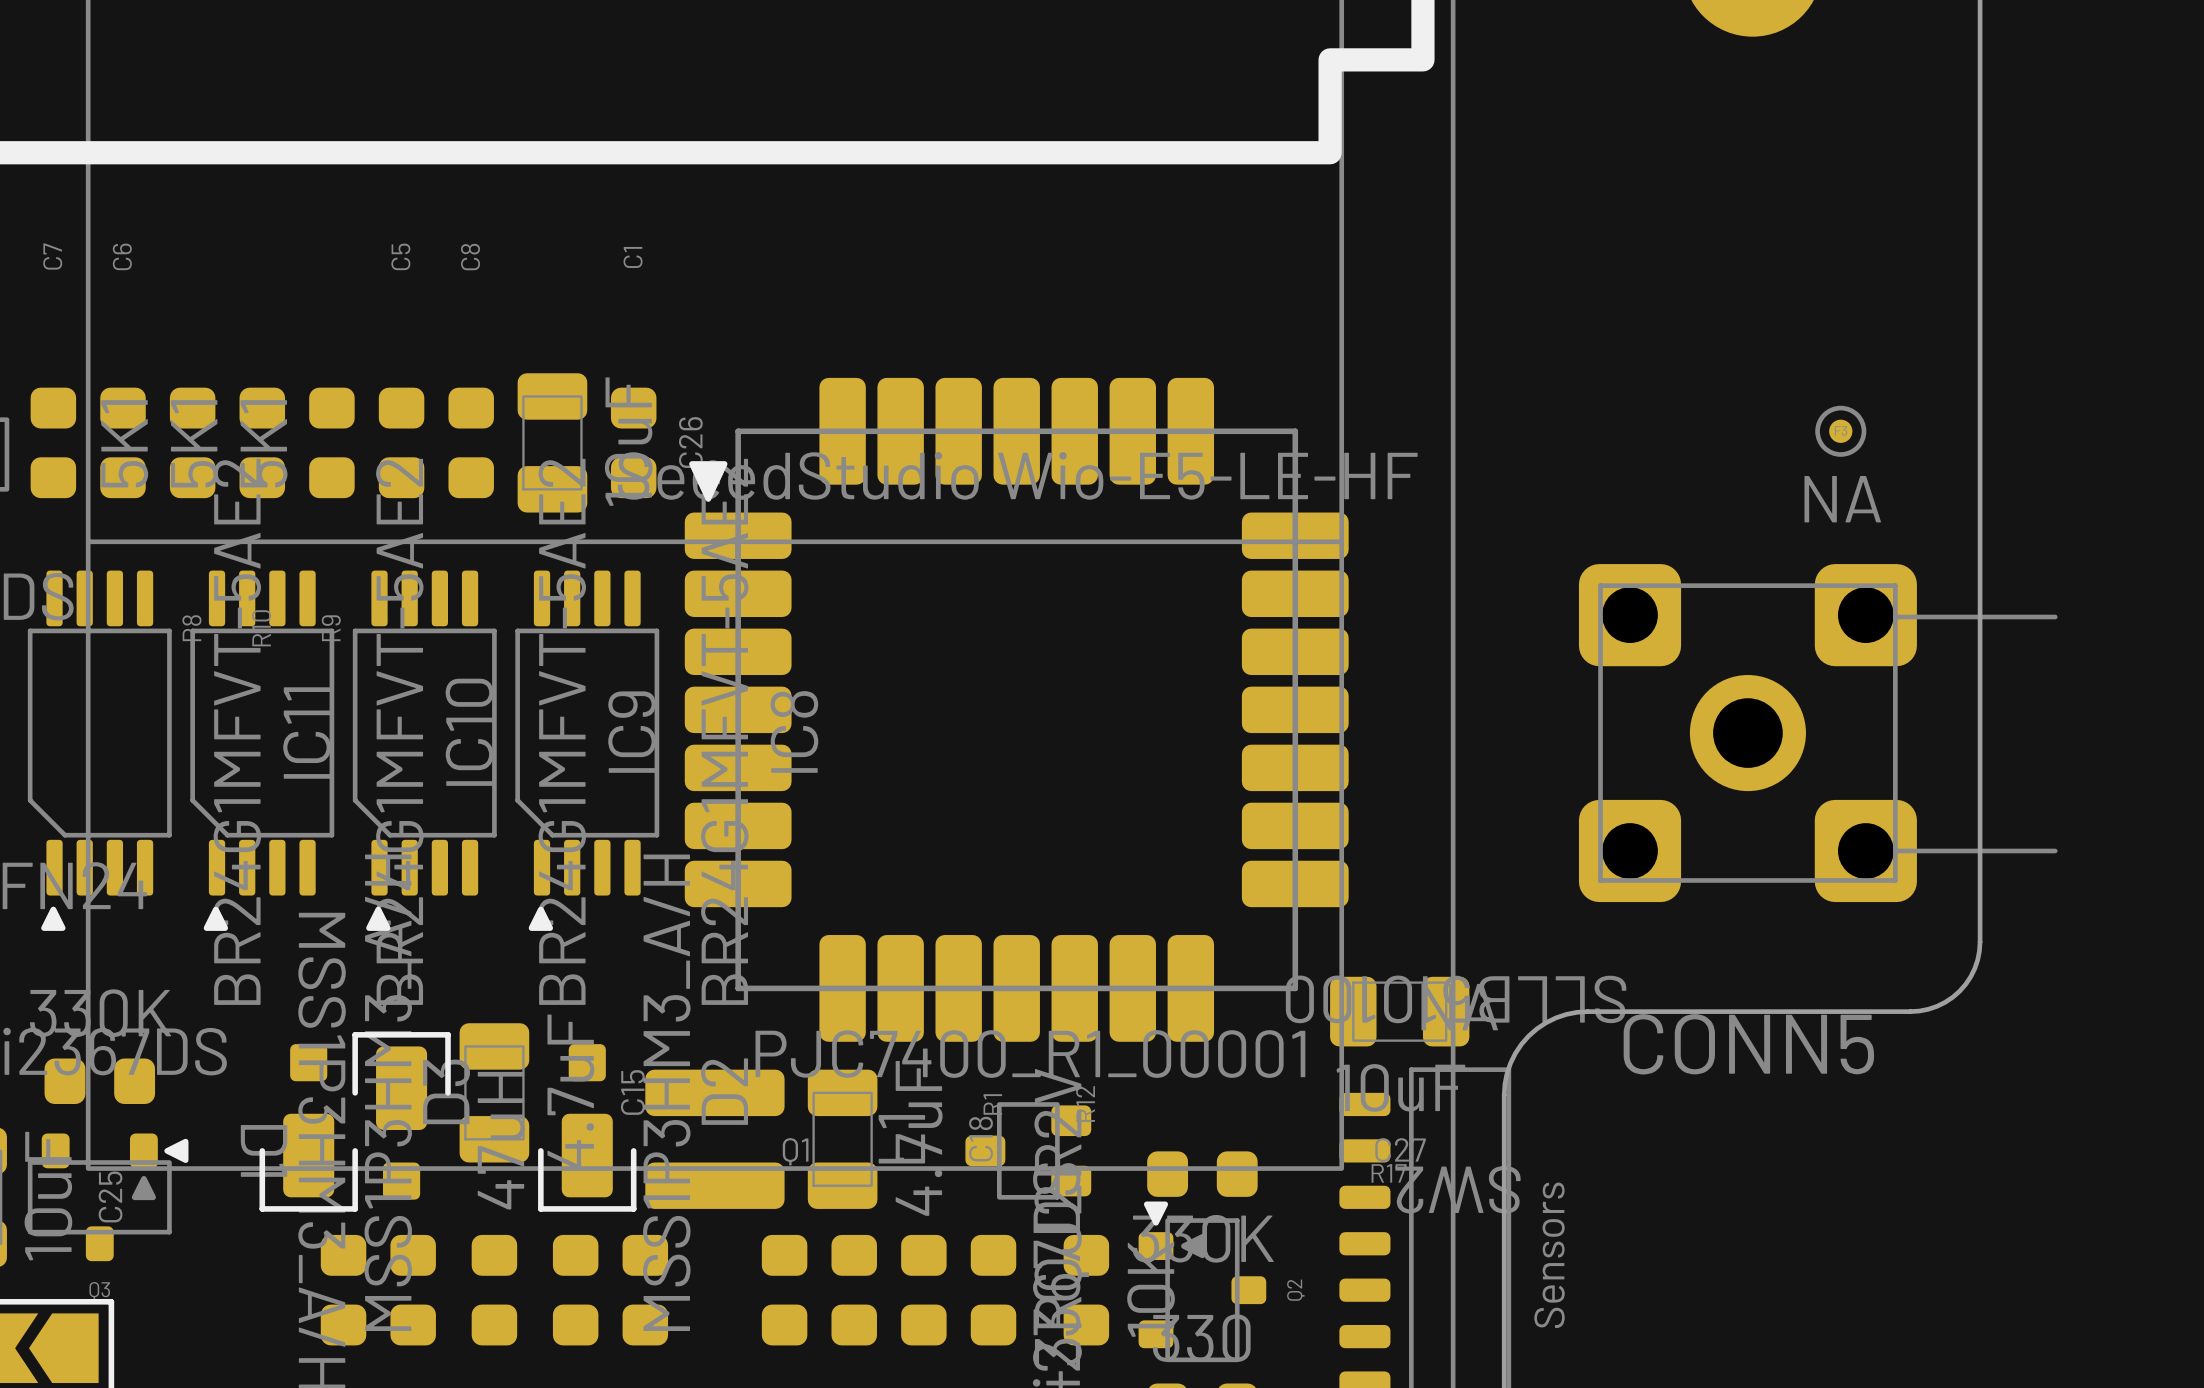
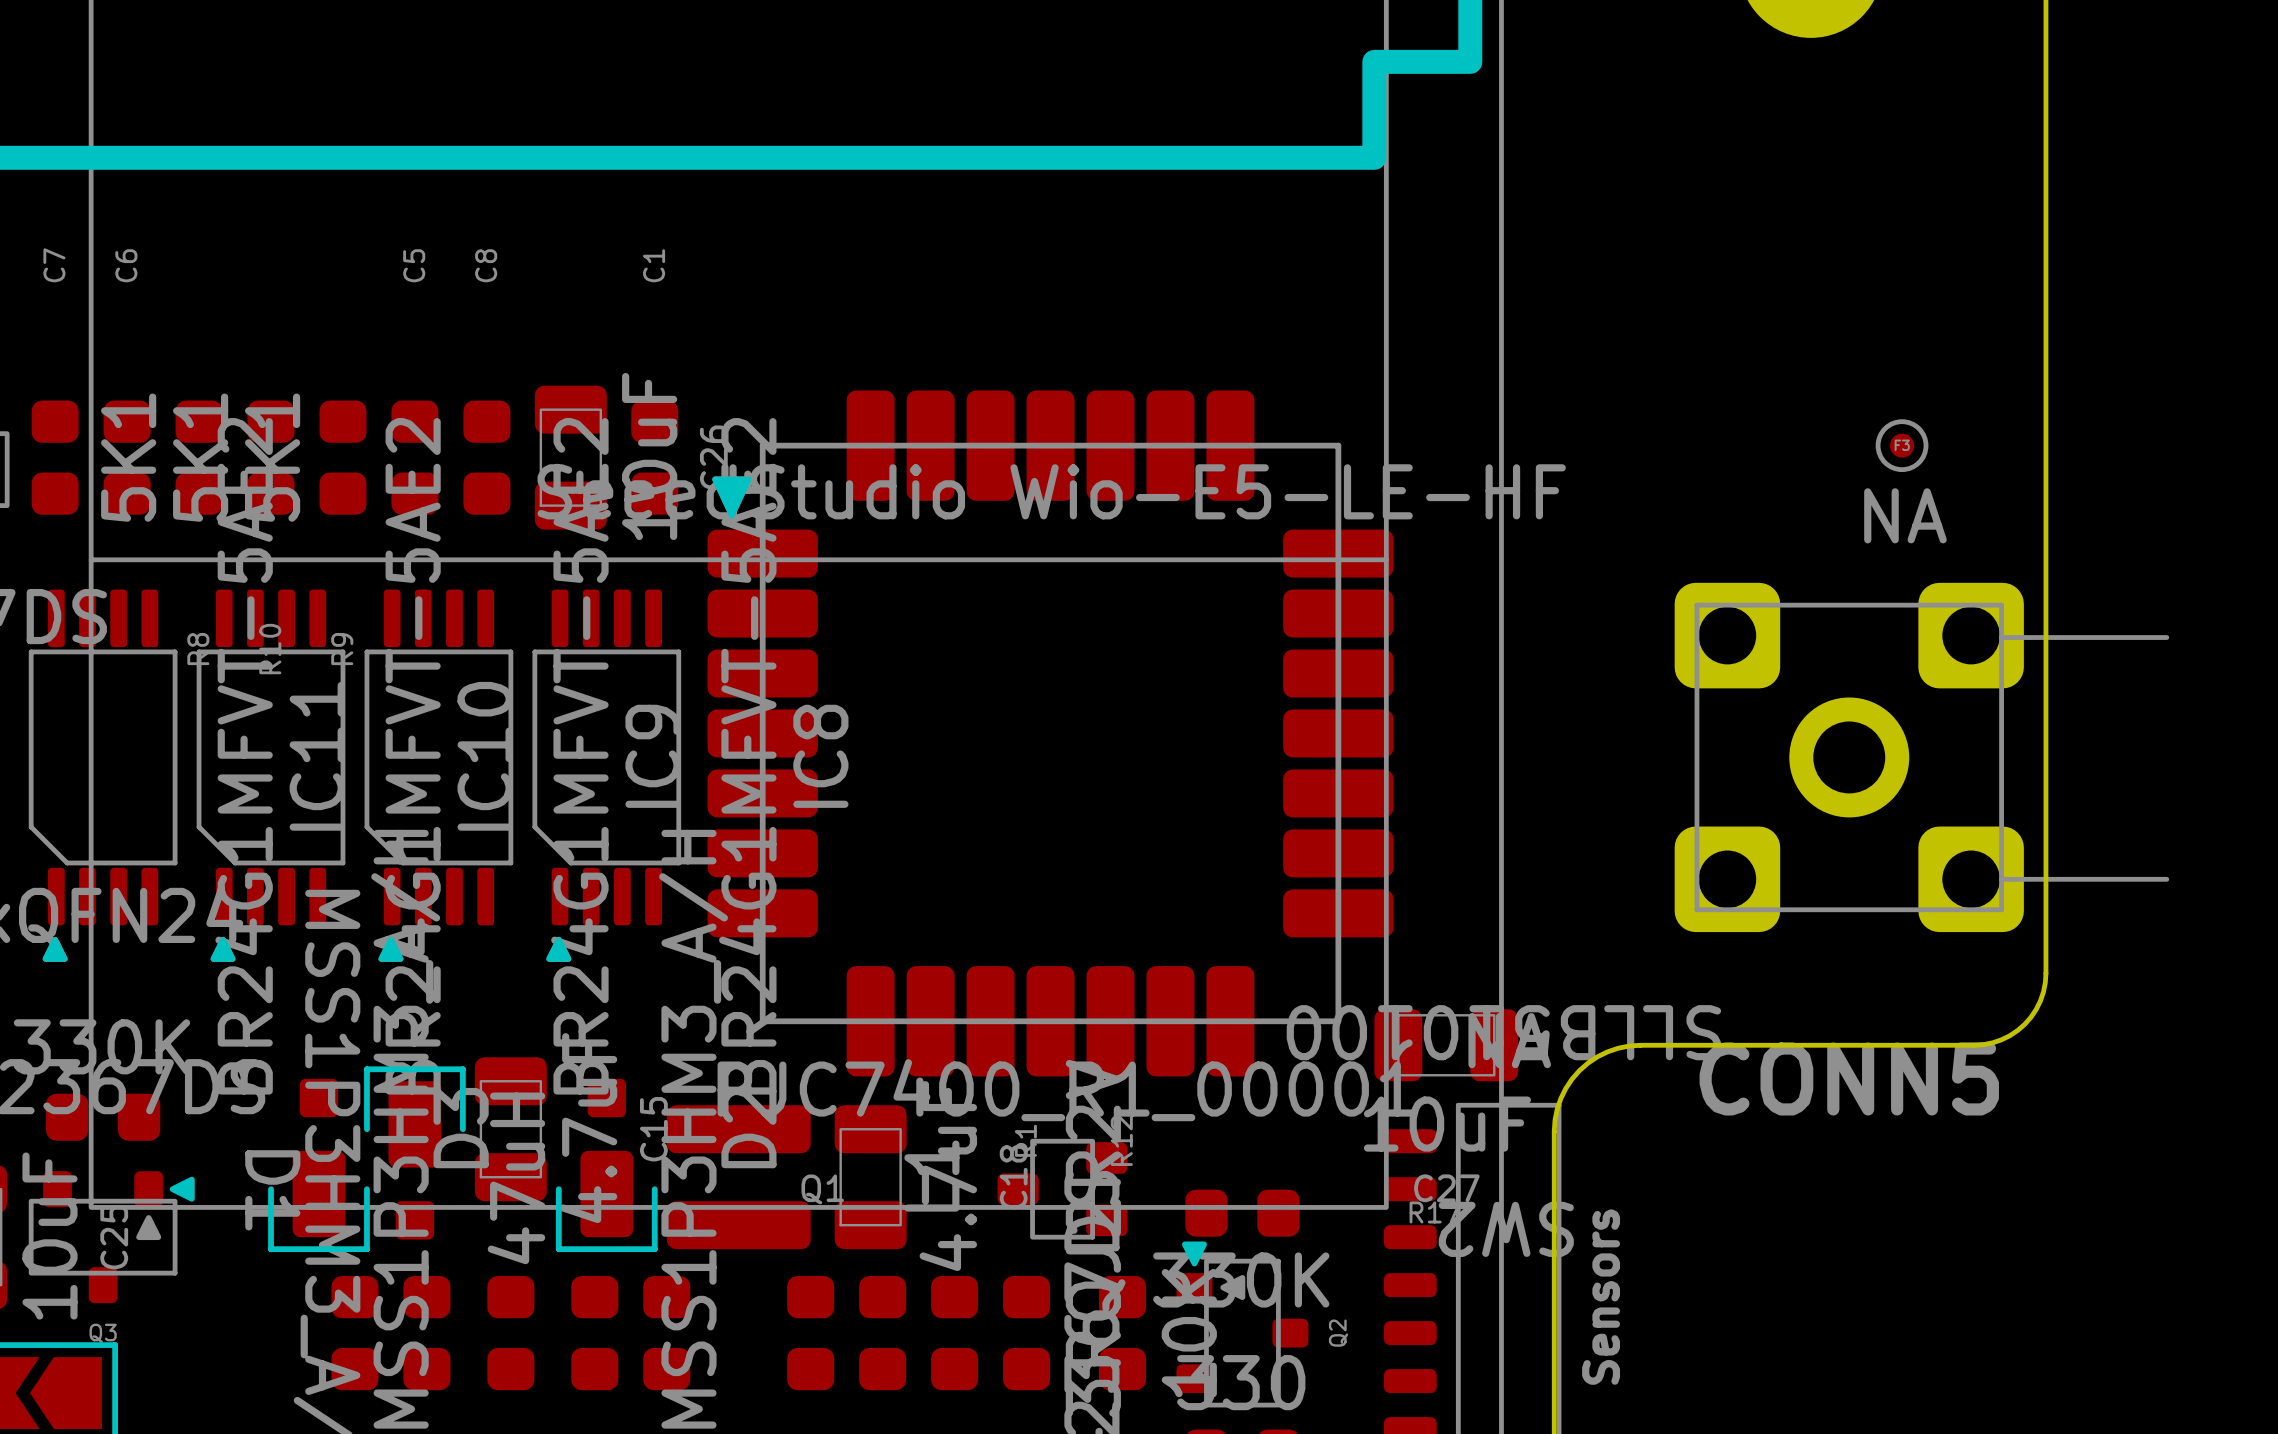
CONN5 position: (1818, 733) -> (1921, 757)

